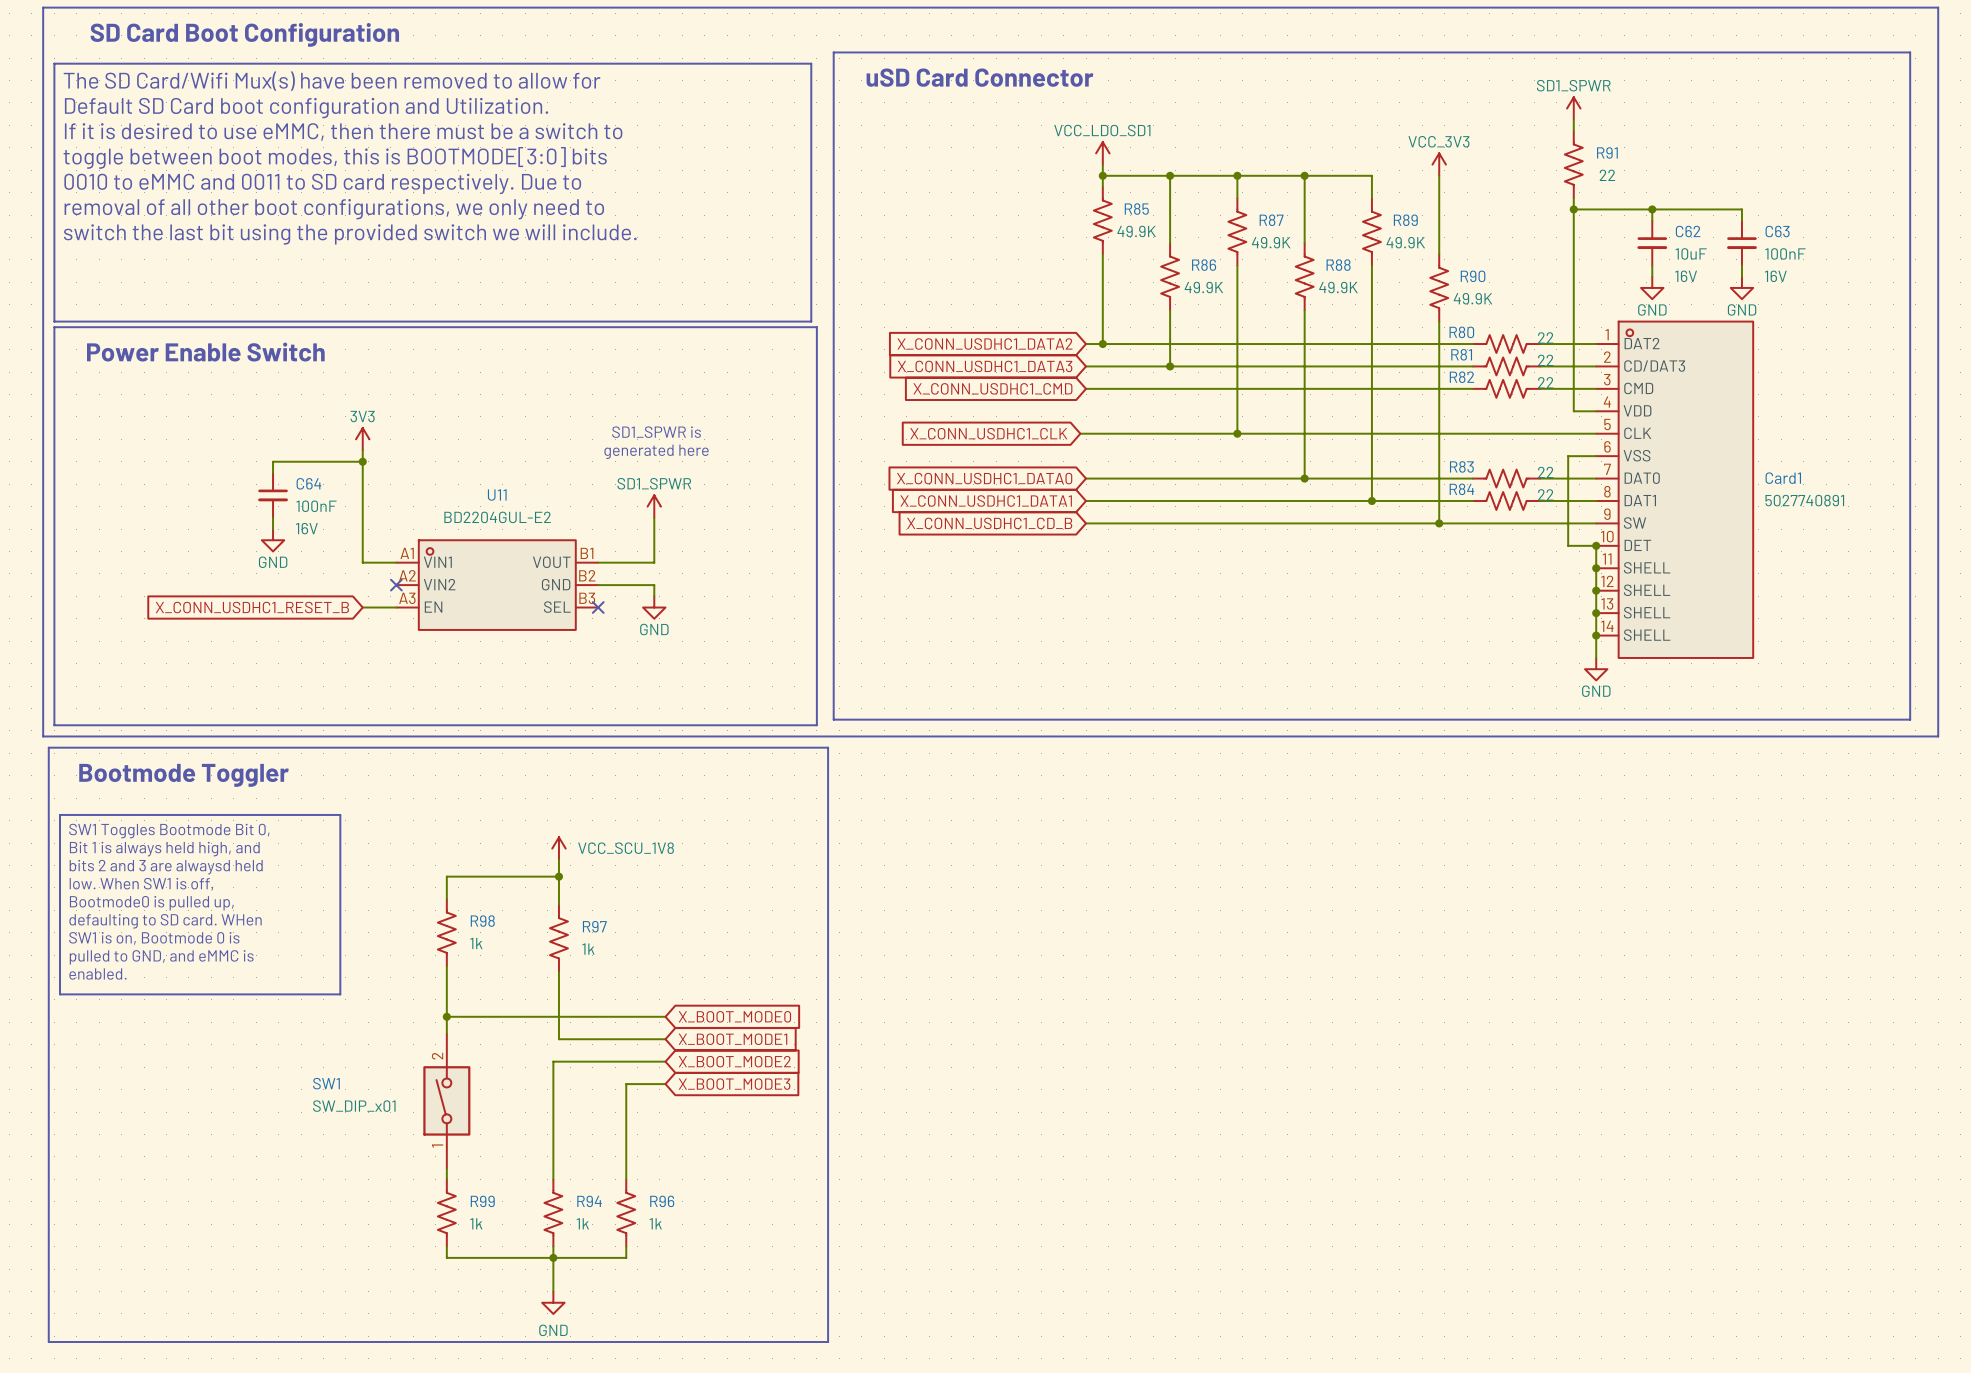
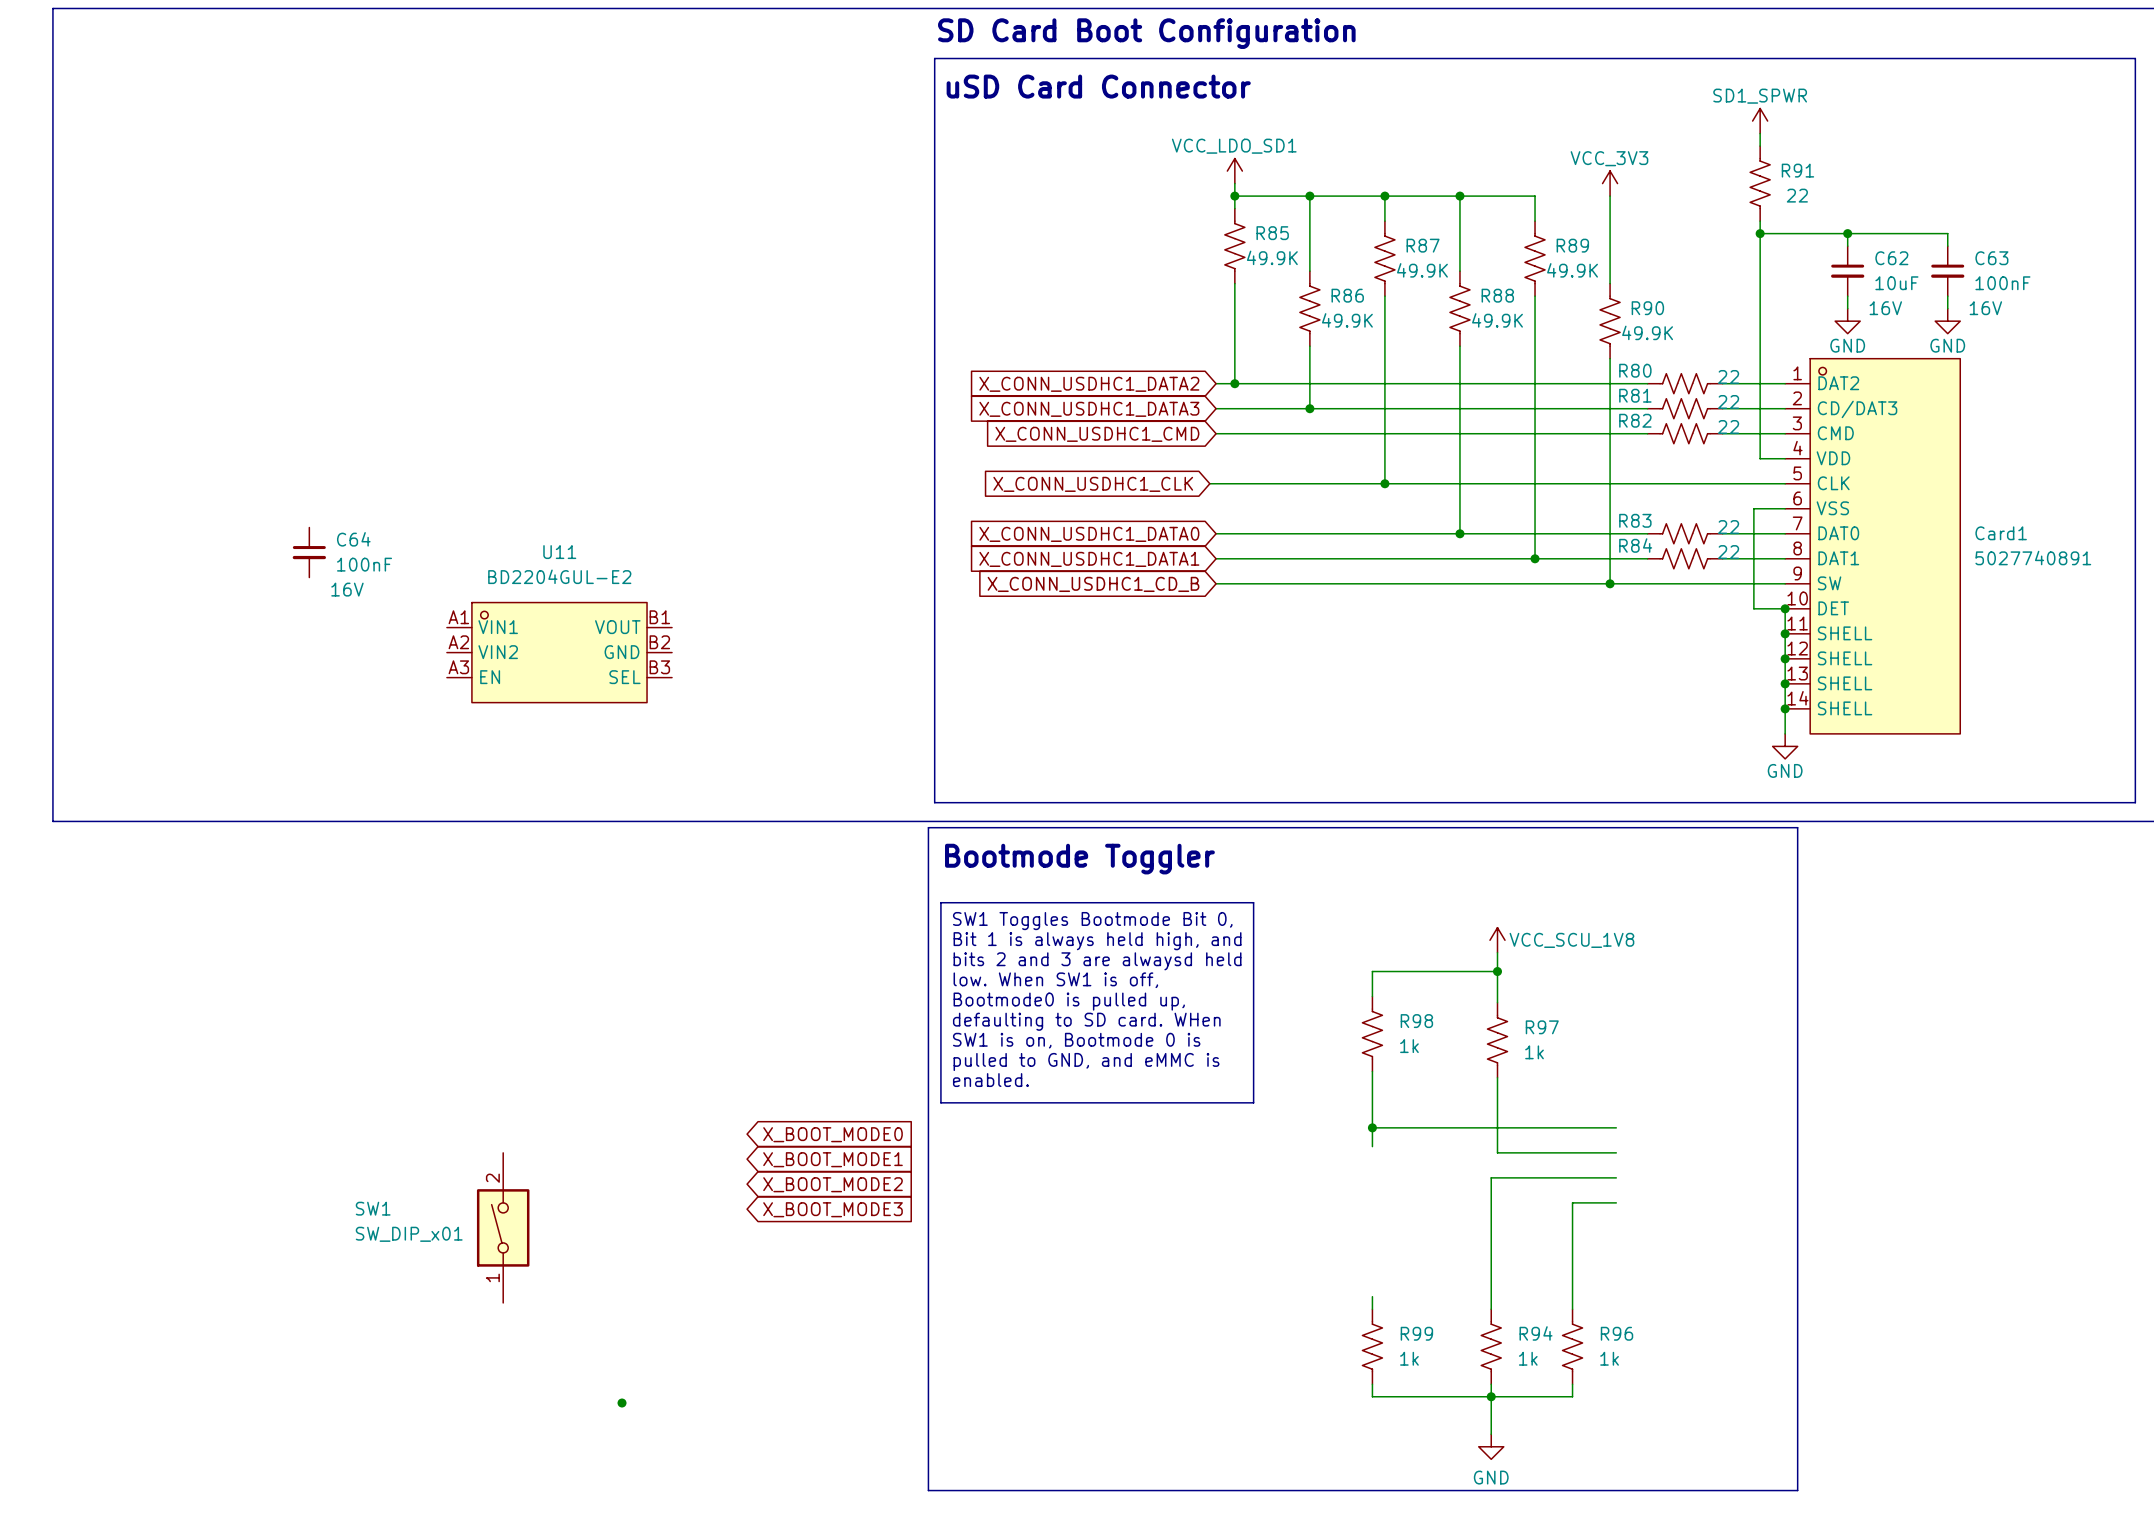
text: none -> SD Card Boot Configuration (1146, 33)
text: SD Card Boot Configuration (244, 34) -> none
line: (54, 63) (54, 321) (811, 321) (811, 63) (54, 63) -> none
text: The SD Card/Wifi Mux(s) have been removed to allow for (332, 81) -> none
text: Default SD Card boot configuration and Utilization. (306, 108) -> none
text: If it is desired to use eMMC, then there must be a switch to (343, 132) -> none
text: toggle between boot modes, this is BOOTMODE[3:0] bits (335, 157) -> none
text: 0010 to eMMC and 0011 to SD card respectively. Due to (322, 183) -> none
text: removal of all other boot configurations, we only need to (334, 209) -> none
text: switch the last bit using the provided switch we will include. (350, 234) -> none
line: (54, 327) (816, 327) (816, 725) (54, 725) (54, 327) -> none
text: Power Enable Switch (205, 352) -> none
text: SD1_SPWR is (656, 432) -> none
power symbol: 3V3 (362, 439) -> none
wire: (362, 450) (362, 562) (396, 562) -> none
text: generated here (656, 451) -> none
wire: (362, 461) (273, 461) (273, 472) -> none
junction: (362, 461) -> none
power symbol: SD1_SPWR (654, 506) -> none
wire: (273, 517) (273, 529) -> none
wire: (654, 517) (654, 562) (598, 562) -> none
power symbol: GND (273, 540) -> none
no-connect mark: (396, 585) -> none
wire: (598, 585) (654, 585) (654, 596) -> none
global label: X_CONN_USDHC1_RESET_B (252, 607) -> none
wire: (362, 607) (396, 607) -> none
no-connect mark: (598, 607) -> none
power symbol: GND (654, 607) -> none
line: (828, 747) (48, 747) (48, 1341) (828, 1341) (828, 1336) -> (928, 833) (928, 827) (1797, 827) (1797, 1490) (928, 1490)
text: none -> Bootmode Toggler (1079, 859)
text: Bootmode Toggler (183, 775) -> none
line: none -> (940, 902) (1253, 902) (1253, 1102) (940, 1102) (940, 902)
line: (59, 814) (340, 814) (340, 994) (59, 994) (59, 814) -> none
text: none -> SW1 Toggles Bootmode Bit 0, (1092, 921)
text: SW1 Toggles Bootmode Bit 0, (169, 831) -> none
text: none -> Bit 1 is always held high, and (1097, 941)
power symbol: none -> VCC_SCU_1V8 (1497, 940)
power symbol: VCC_SCU_1V8 (558, 848) -> none
text: Bit 1 is always held high, and (164, 849) -> none
wire: none -> (1497, 952) (1497, 1002)
wire: (558, 859) (558, 904) -> none
text: none -> bits 2 and 3 are alwaysd held (1097, 961)
text: bits 2 and 3 are alwaysd held (166, 867) -> none
wire: none -> (1497, 971) (1372, 971) (1372, 996)
junction: none -> (1497, 971)
wire: (558, 876) (446, 876) (446, 899) -> none
junction: (558, 876) -> none
text: none -> low. When SW1 is off, (1055, 980)
text: low. When SW1 is off, (141, 884) -> none
text: none -> Bootmode0 is pulled up, (1069, 1001)
text: Bootmode0 is pulled up, (151, 903) -> none
text: none -> defaulting to SD card. WHen (1086, 1021)
text: defaulting to SD card. WHen (165, 921) -> none
R98 position: (446, 932) -> (1372, 1034)
text: none -> SW1 is on, Bootmode 0 is (1076, 1040)
text: SW1 is on, Bootmode 0 is (154, 938) -> none
R97 position: (558, 938) -> (1497, 1040)
text: none -> pulled to GND, and eMMC is (1086, 1062)
text: pulled to GND, and eMMC is (161, 957) -> none
wire: none -> (1372, 1071) (1372, 1146)
wire: (446, 966) (446, 1033) -> none
wire: none -> (1497, 1077) (1497, 1152) (1616, 1152)
text: none -> enabled. (990, 1080)
wire: (558, 971) (558, 1039) (665, 1039) -> none
text: enabled. (98, 974) -> none
wire: none -> (1372, 1127) (1616, 1127)
junction: none -> (1372, 1127)
wire: (446, 1016) (665, 1016) -> none
junction: (446, 1016) -> none
wire: none -> (1616, 1177) (1491, 1177) (1491, 1309)
wire: (665, 1061) (553, 1061) (553, 1179) -> none
wire: none -> (1616, 1202) (1572, 1202) (1572, 1309)
wire: (665, 1084) (626, 1084) (626, 1179) -> none
wire: none -> (1372, 1296) (1372, 1309)
wire: (446, 1168) (446, 1179) -> none
R99 position: (446, 1213) -> (1372, 1346)
R94 position: (553, 1213) -> (1491, 1346)
R96 position: (626, 1213) -> (1572, 1346)
wire: none -> (1372, 1384) (1372, 1396) (1572, 1396) (1572, 1384)
wire: none -> (1491, 1384) (1491, 1434)
wire: (446, 1246) (446, 1257) (626, 1257) (626, 1246) -> none
wire: (553, 1246) (553, 1291) -> none
junction: none -> (1491, 1396)
power symbol: none -> GND (1491, 1446)
power symbol: GND (553, 1302) -> none

